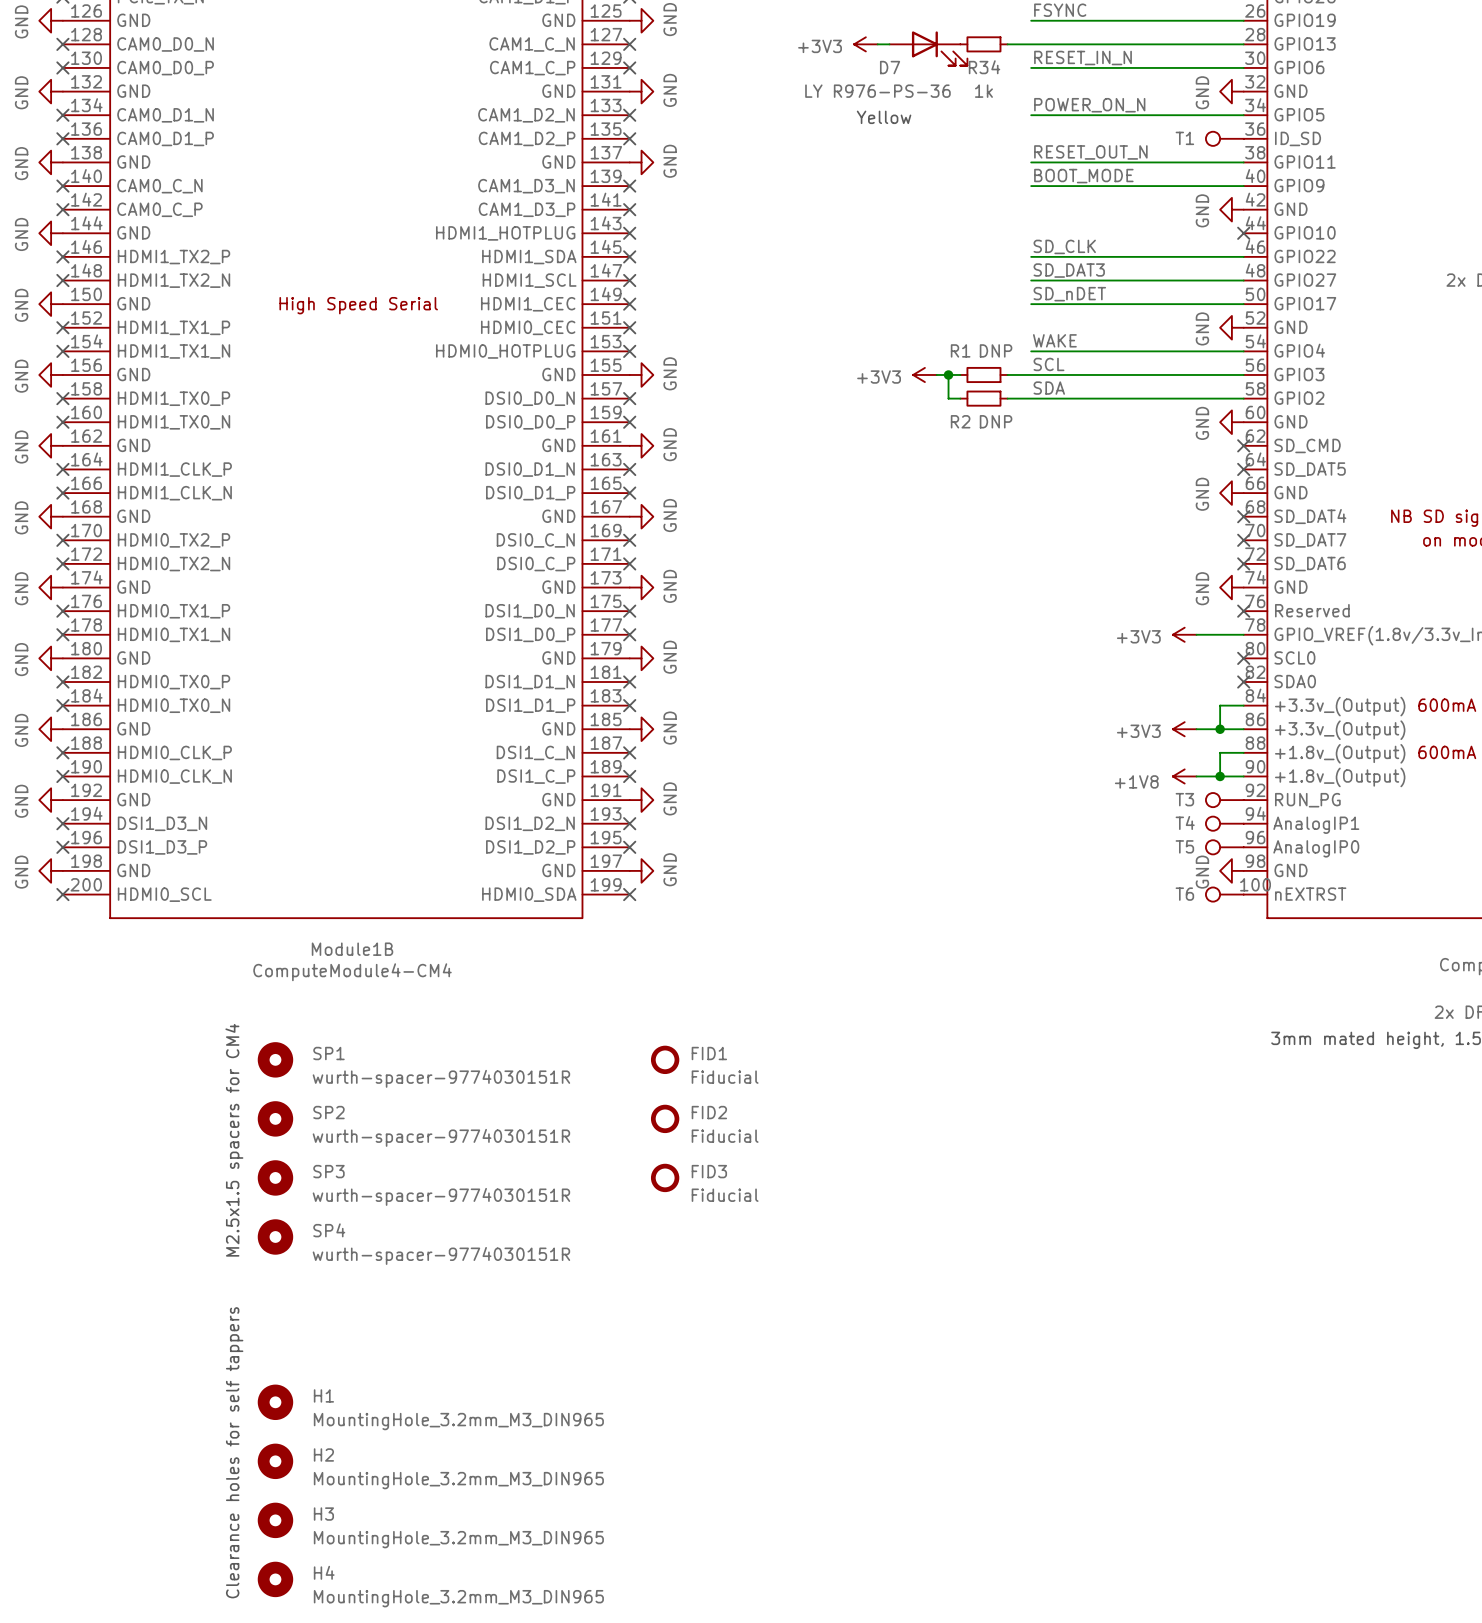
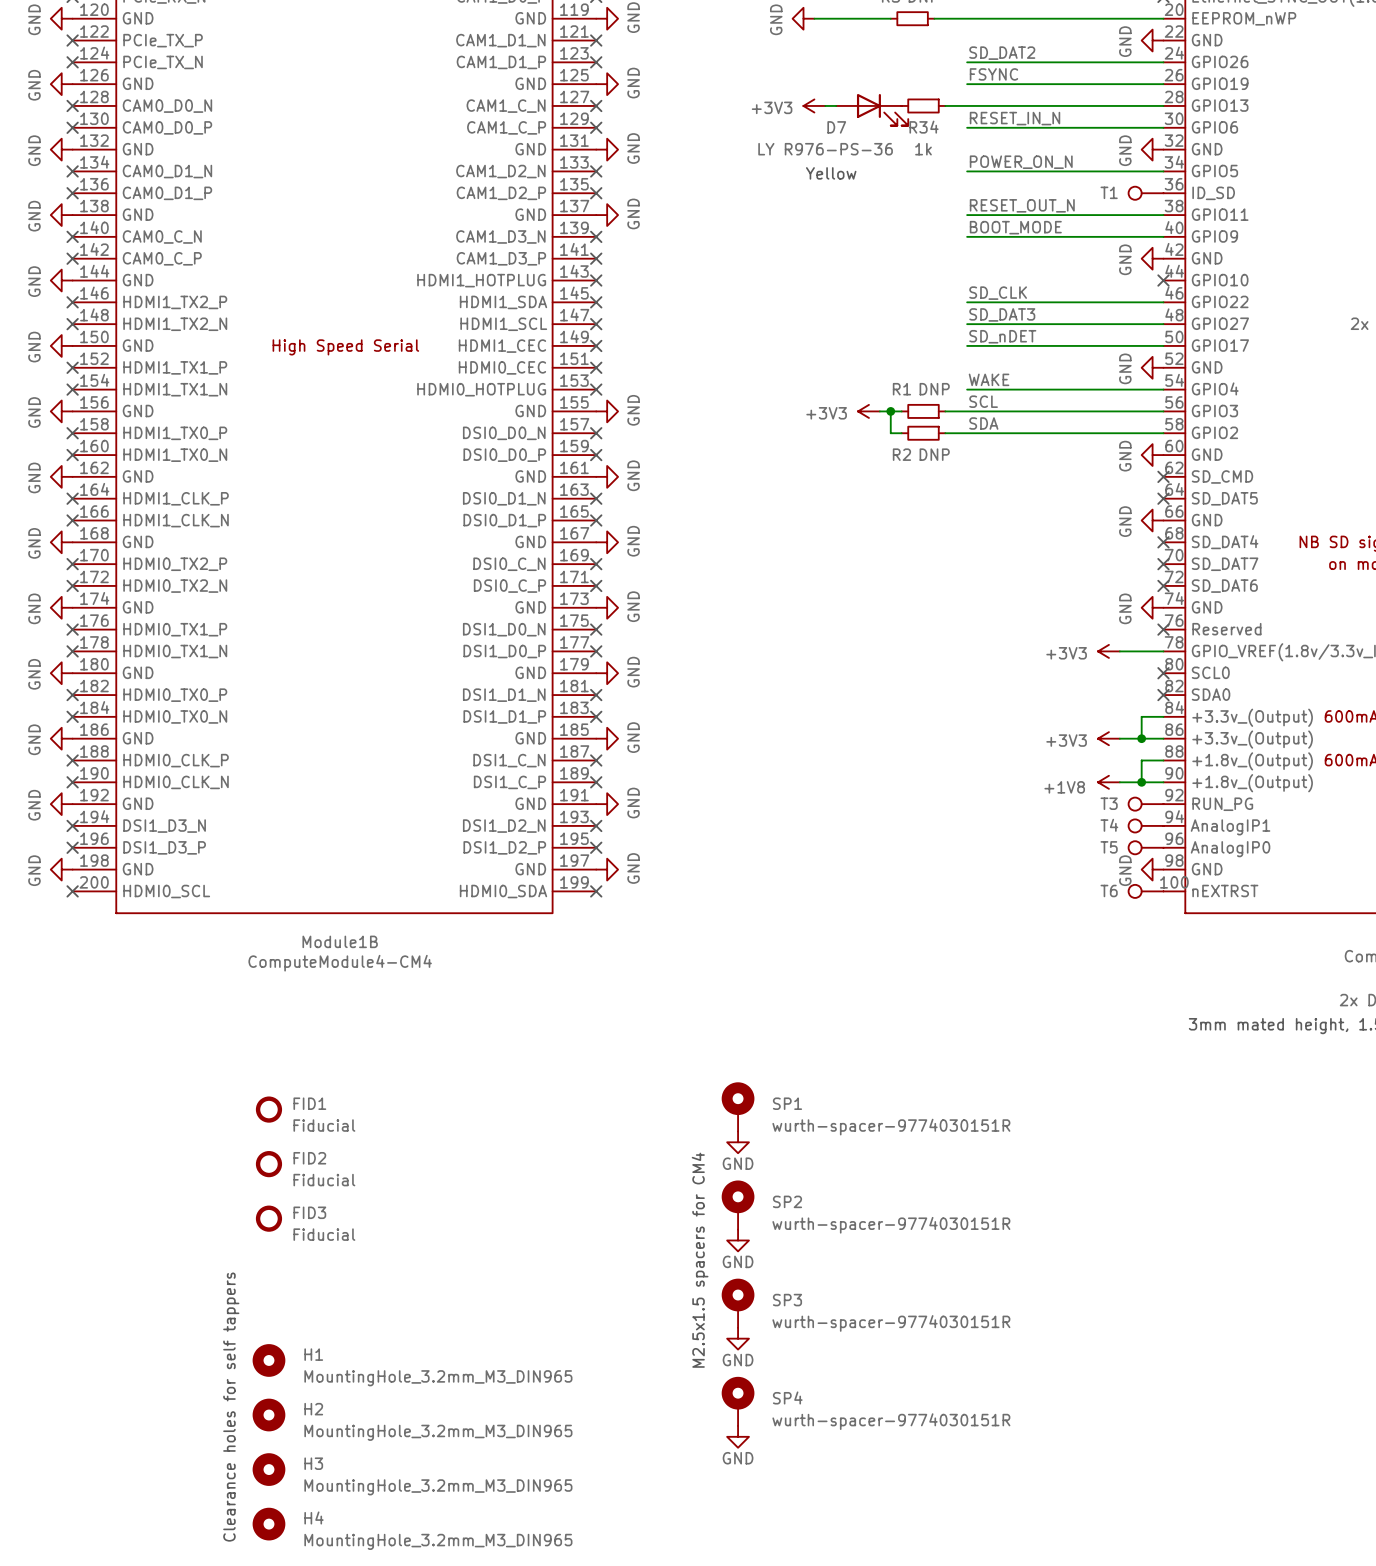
SP1 symbol: [257, 1042, 294, 1078] -> [721, 1082, 755, 1132]
FID1 position: (665, 1059) -> (268, 1109)
SP2 symbol: [257, 1101, 294, 1137] -> [721, 1180, 755, 1230]
FID2 position: (665, 1118) -> (268, 1164)
text: M2.5x1.5 spacers for CM4 (234, 1140) -> none
SP3 symbol: [257, 1160, 294, 1196] -> [721, 1278, 755, 1328]
power symbol: none -> GND (738, 1142)
FID3 position: (665, 1177) -> (268, 1218)
SP4 symbol: [257, 1219, 294, 1255] -> [721, 1376, 755, 1426]
power symbol: none -> GND (738, 1240)
text: none -> M2.5x1.5 spacers for CM4 (700, 1260)
power symbol: none -> GND (738, 1338)
power symbol: none -> GND (738, 1436)

